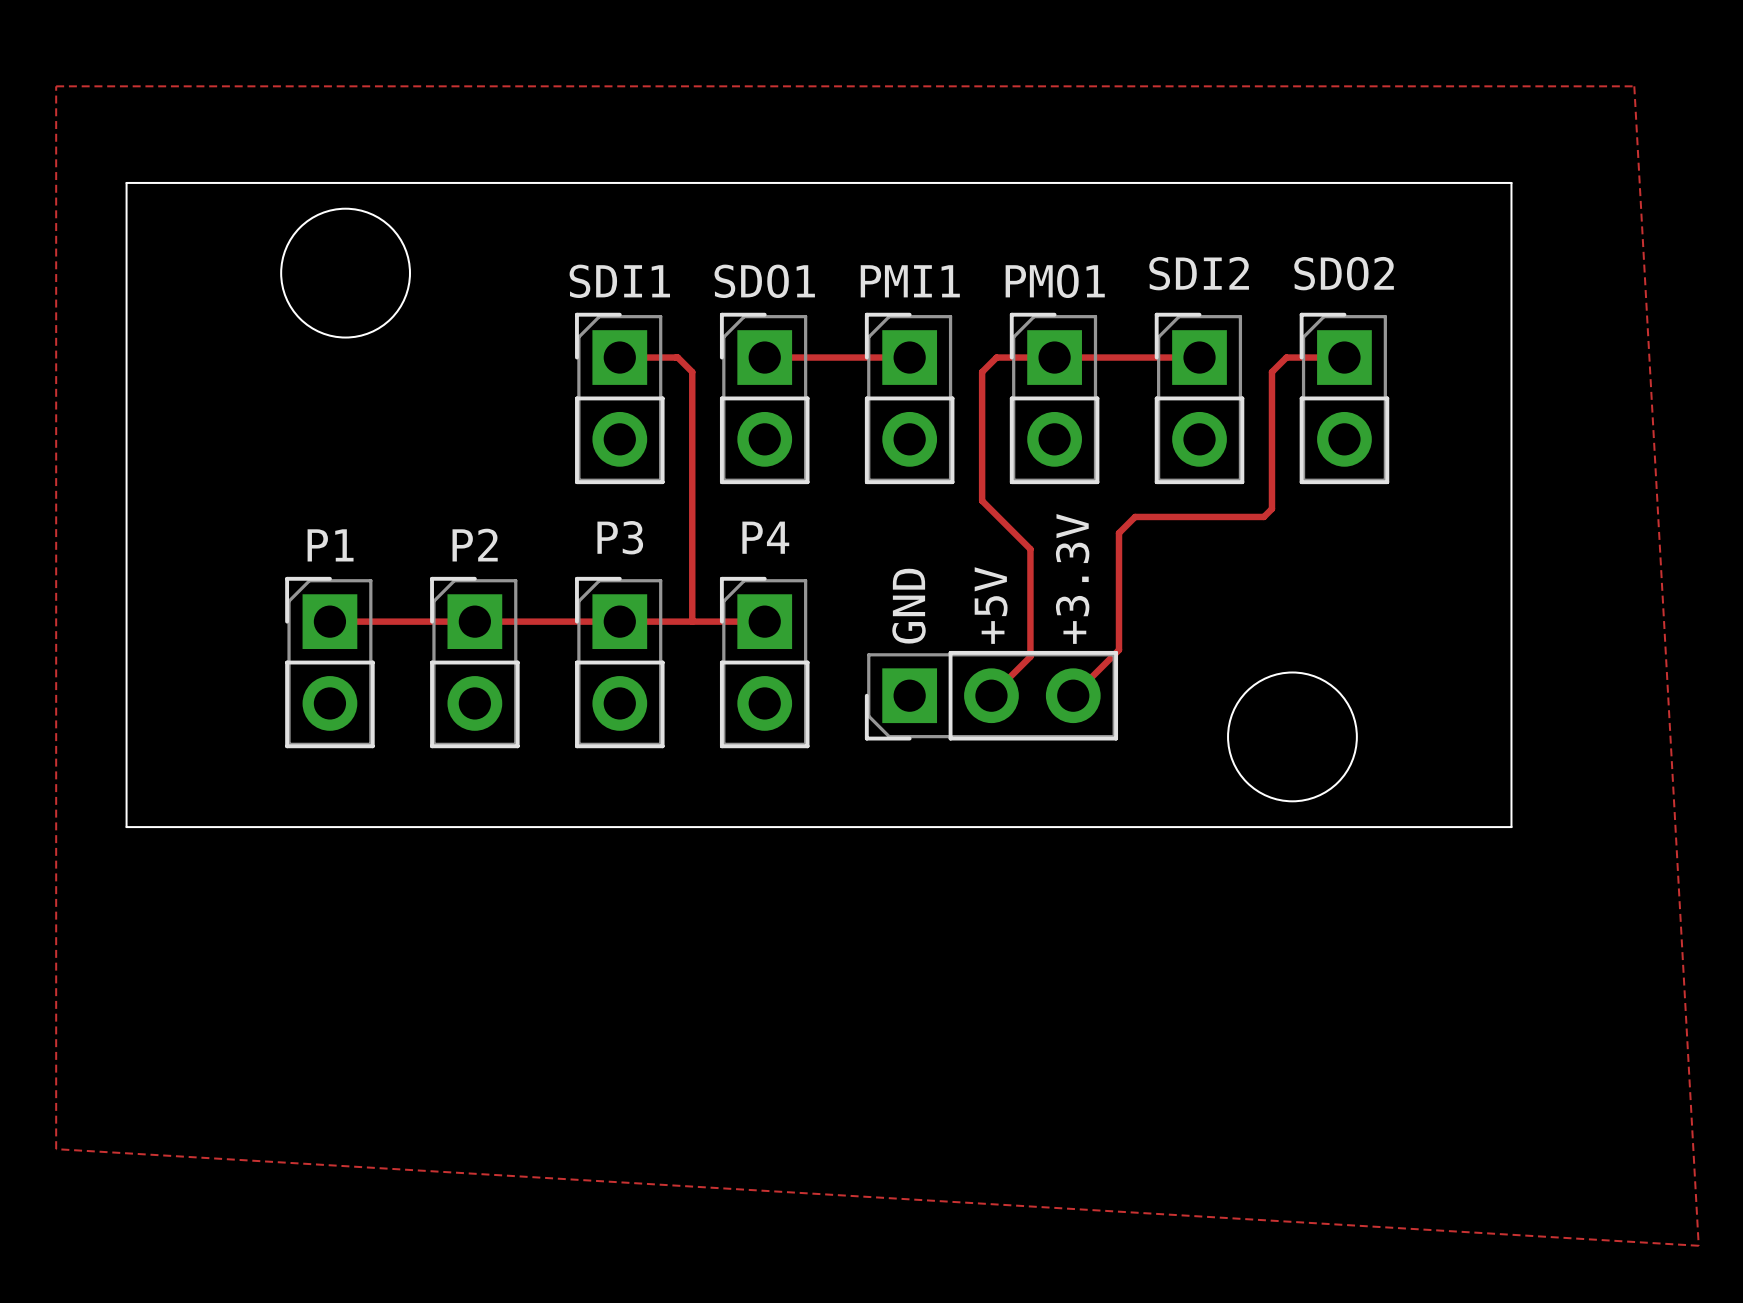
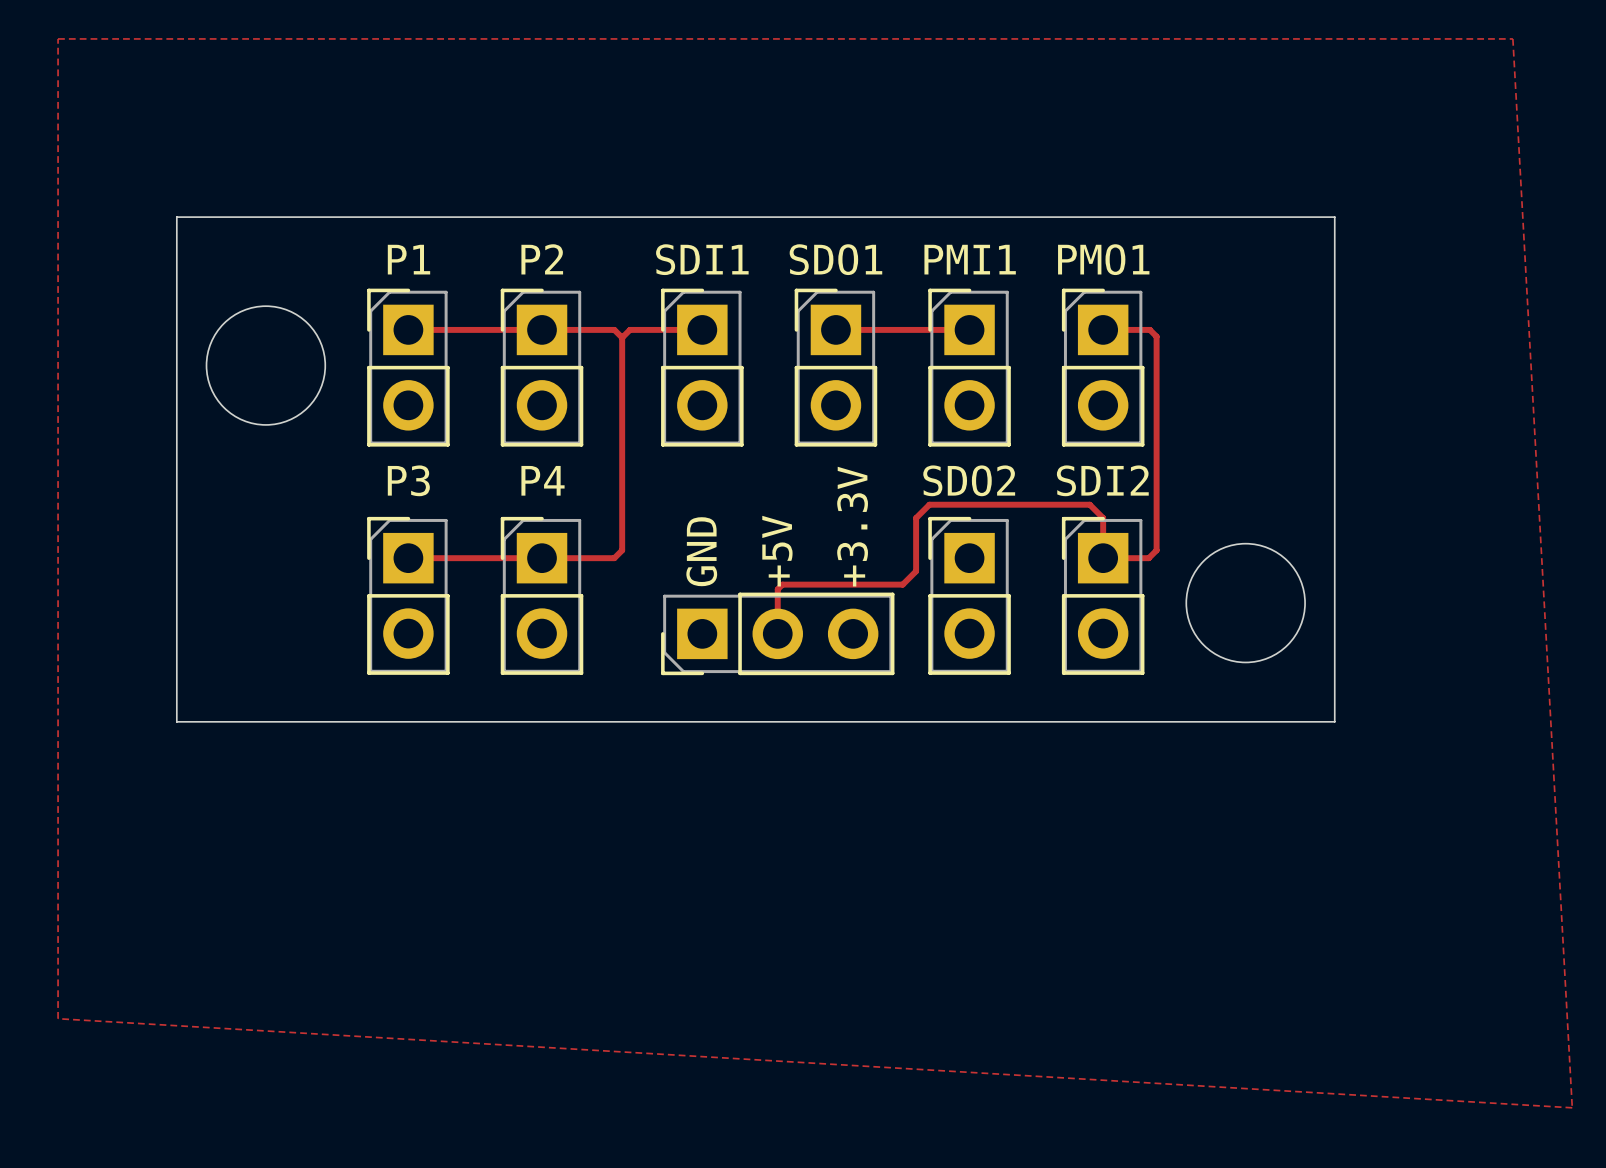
round board edge position: (345, 273) -> (265, 365)
track: (619, 357) (677, 357) (692, 372) (692, 621) -> none
track: (764, 357) (909, 357) -> (835, 329) (969, 329)
track: (1199, 357) (996, 357) (982, 372) (982, 500) (1030, 549) (1030, 656) (991, 695) -> none
track: (1344, 357) (1286, 357) (1271, 372) (1271, 508) (1263, 516) (1135, 516) (1119, 533) (1119, 649) (1073, 695) -> none
SDI1 position: (619, 398) -> (702, 367)
SDO1 position: (764, 398) -> (835, 367)
PMI1 position: (909, 398) -> (969, 367)
PMO1 position: (1054, 398) -> (1103, 367)
SDI2 position: (1199, 398) -> (1103, 595)
SDO2 position: (1344, 398) -> (969, 595)
track: none -> (408, 329) (614, 329) (622, 337)
track: none -> (702, 329) (629, 329) (622, 337)
track: none -> (1103, 329) (1149, 329) (1156, 336) (1156, 550) (1148, 558) (1103, 558) (1103, 518) (1089, 504) (929, 504) (916, 518) (916, 571) (902, 584) (782, 584) (777, 589) (777, 633)
track: none -> (622, 337) (622, 550) (614, 558) (408, 558)
text position: +3.3V (1072, 578) -> +3.3V (852, 526)
text position: +5V (991, 605) -> +5V (777, 551)
text position: GND (909, 606) -> GND (701, 551)
track: (329, 621) (764, 621) -> none
P1 position: (329, 662) -> (408, 367)
P2 position: (474, 662) -> (542, 367)
P3 position: (619, 662) -> (408, 595)
P4 position: (764, 662) -> (542, 595)
part position: (991, 695) -> (777, 633)
round board edge position: (1292, 736) -> (1245, 603)
board edge: (185, 827) (126, 827) (126, 182) (1511, 182) (1511, 827) (1441, 827) -> (176, 721) (176, 217) (1334, 217) (1334, 721)

